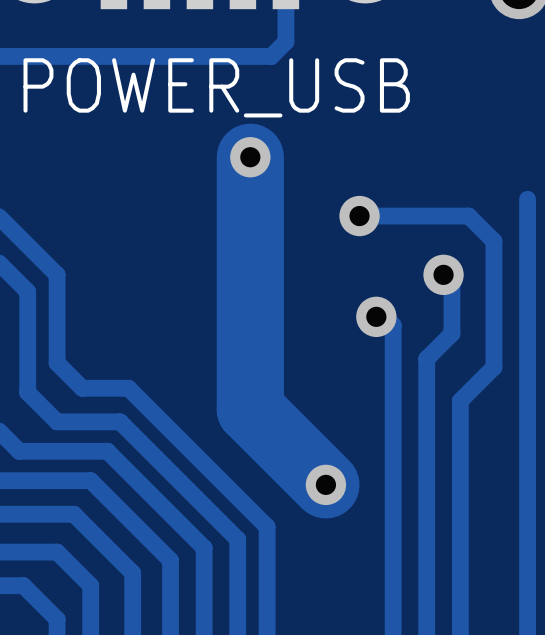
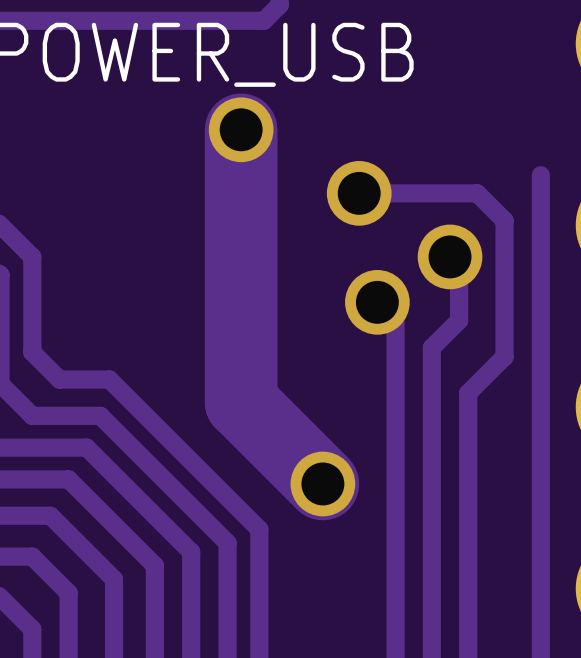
via size: [230, 137, 271, 178] -> [208, 97, 274, 163]
via size: [339, 195, 380, 237] -> [326, 161, 392, 226]
via size: [423, 254, 464, 296] -> [417, 224, 483, 290]
via size: [356, 296, 397, 338] -> [345, 269, 410, 335]
via size: [305, 464, 347, 506] -> [290, 451, 356, 517]

